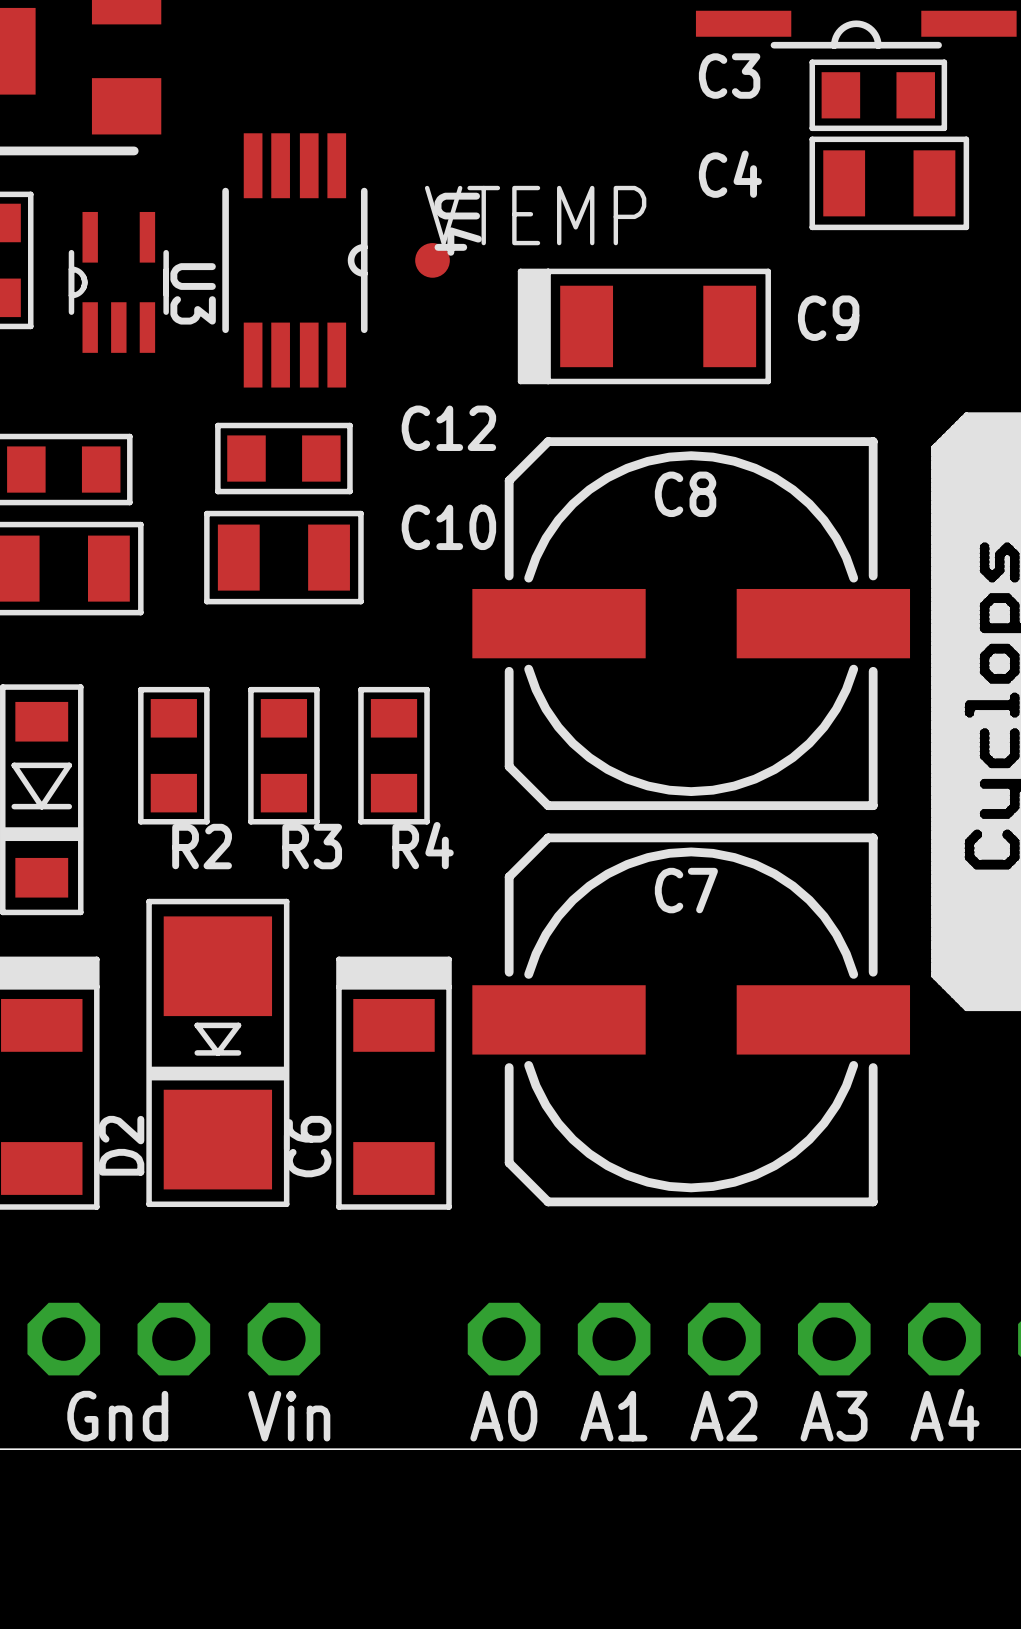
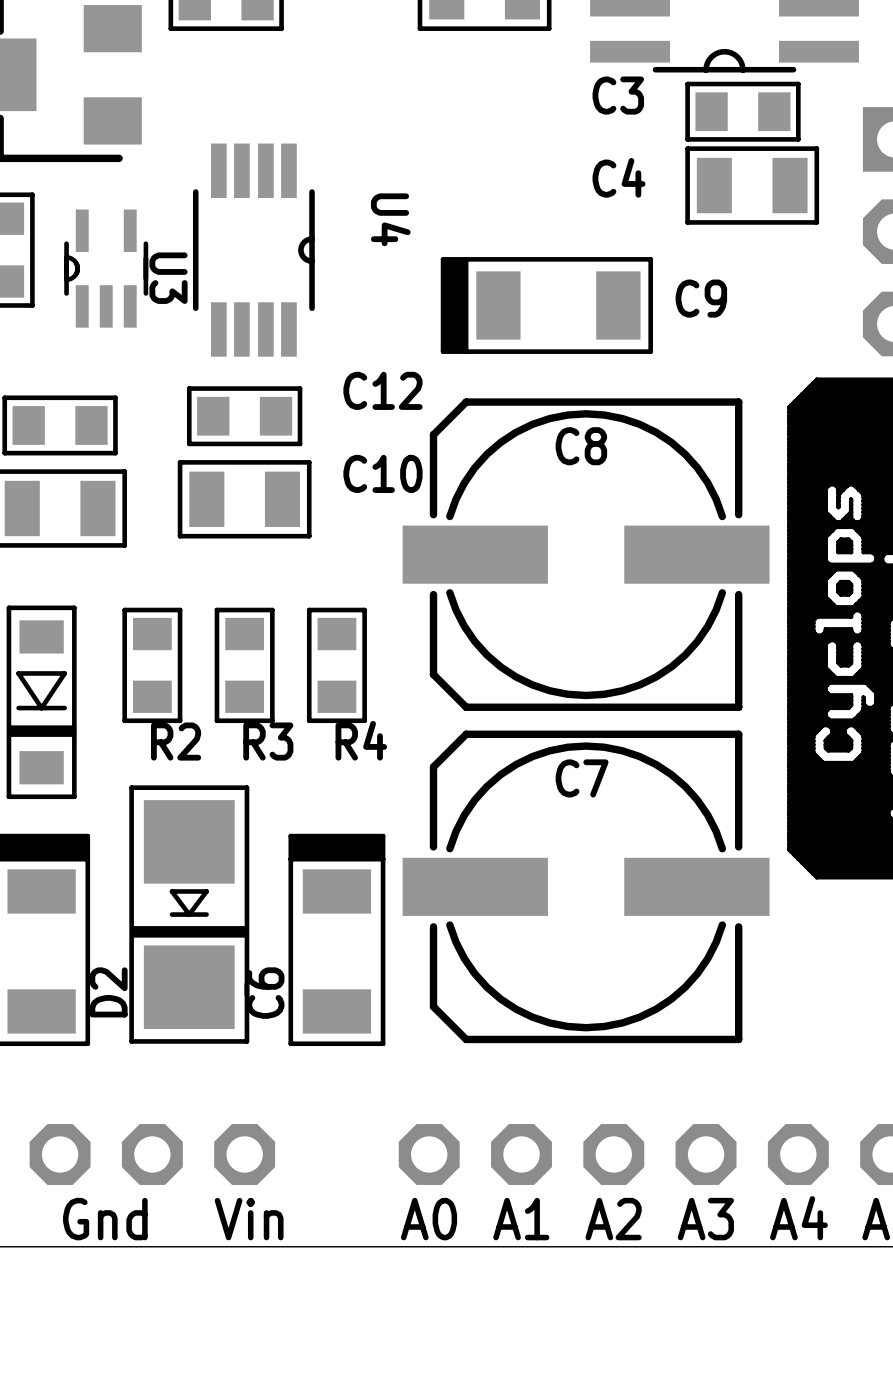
VTEMP: (432, 260) -> none

